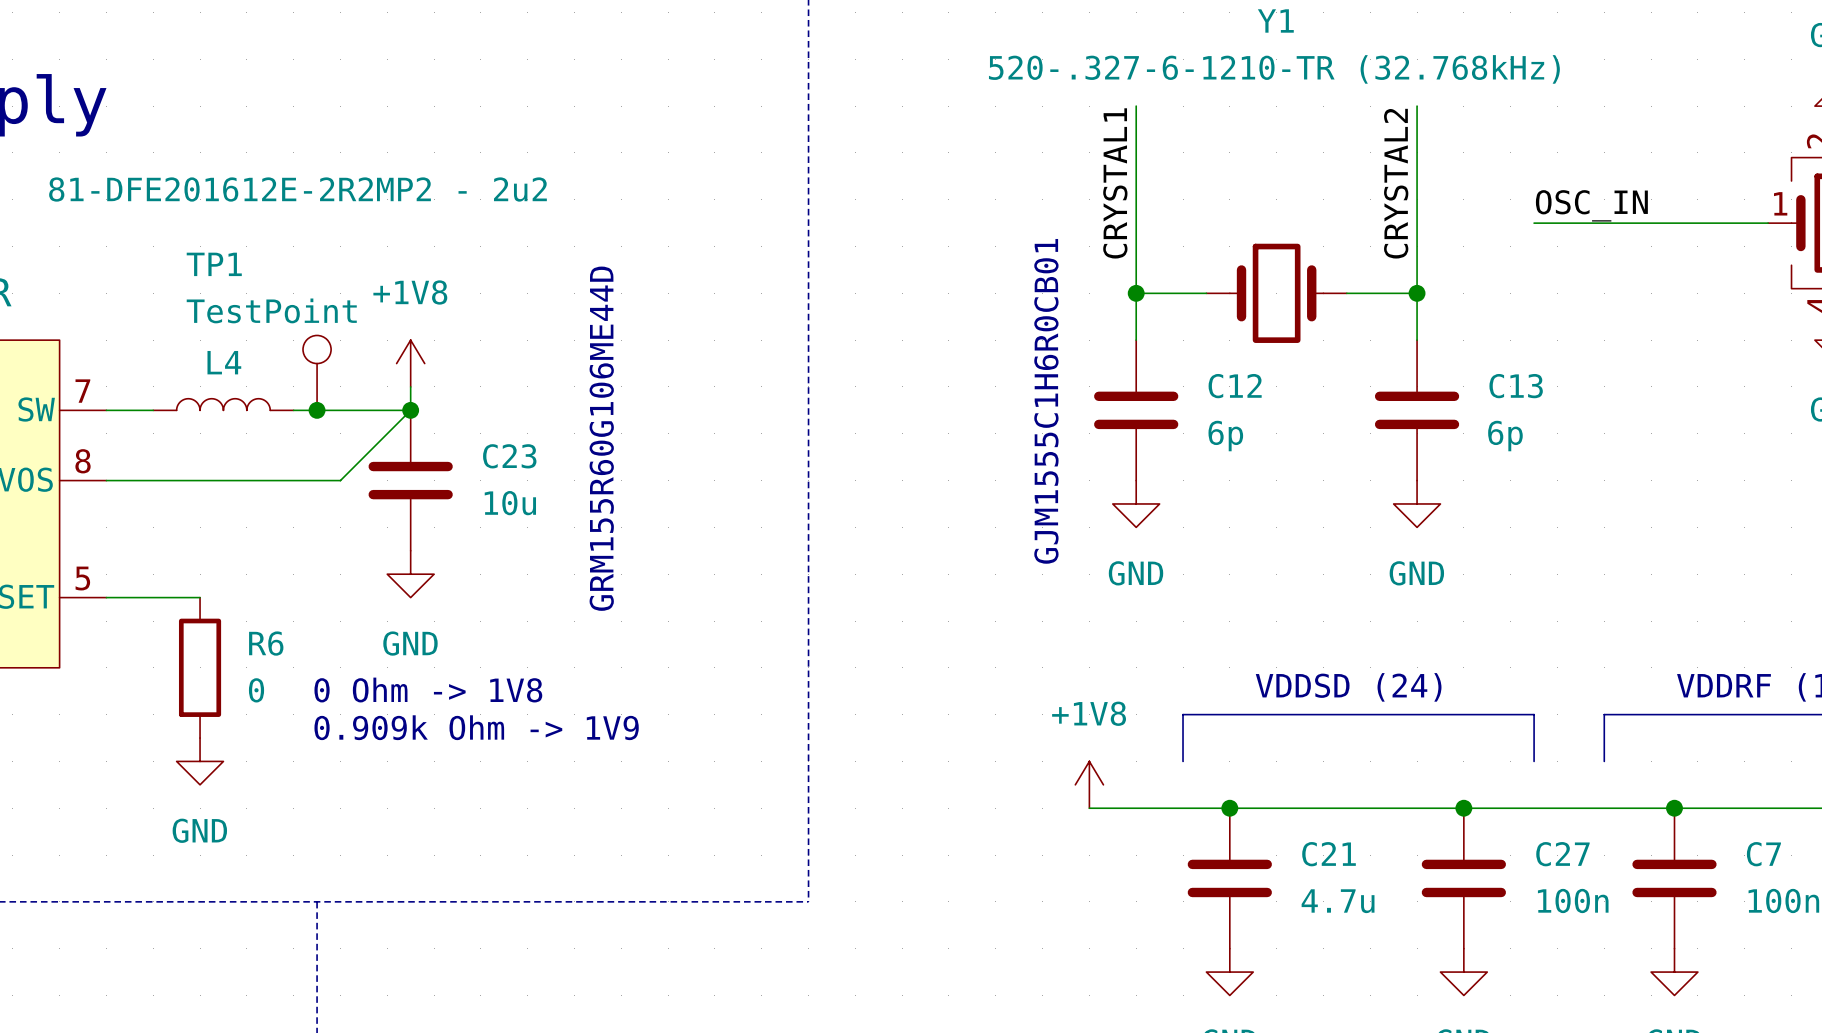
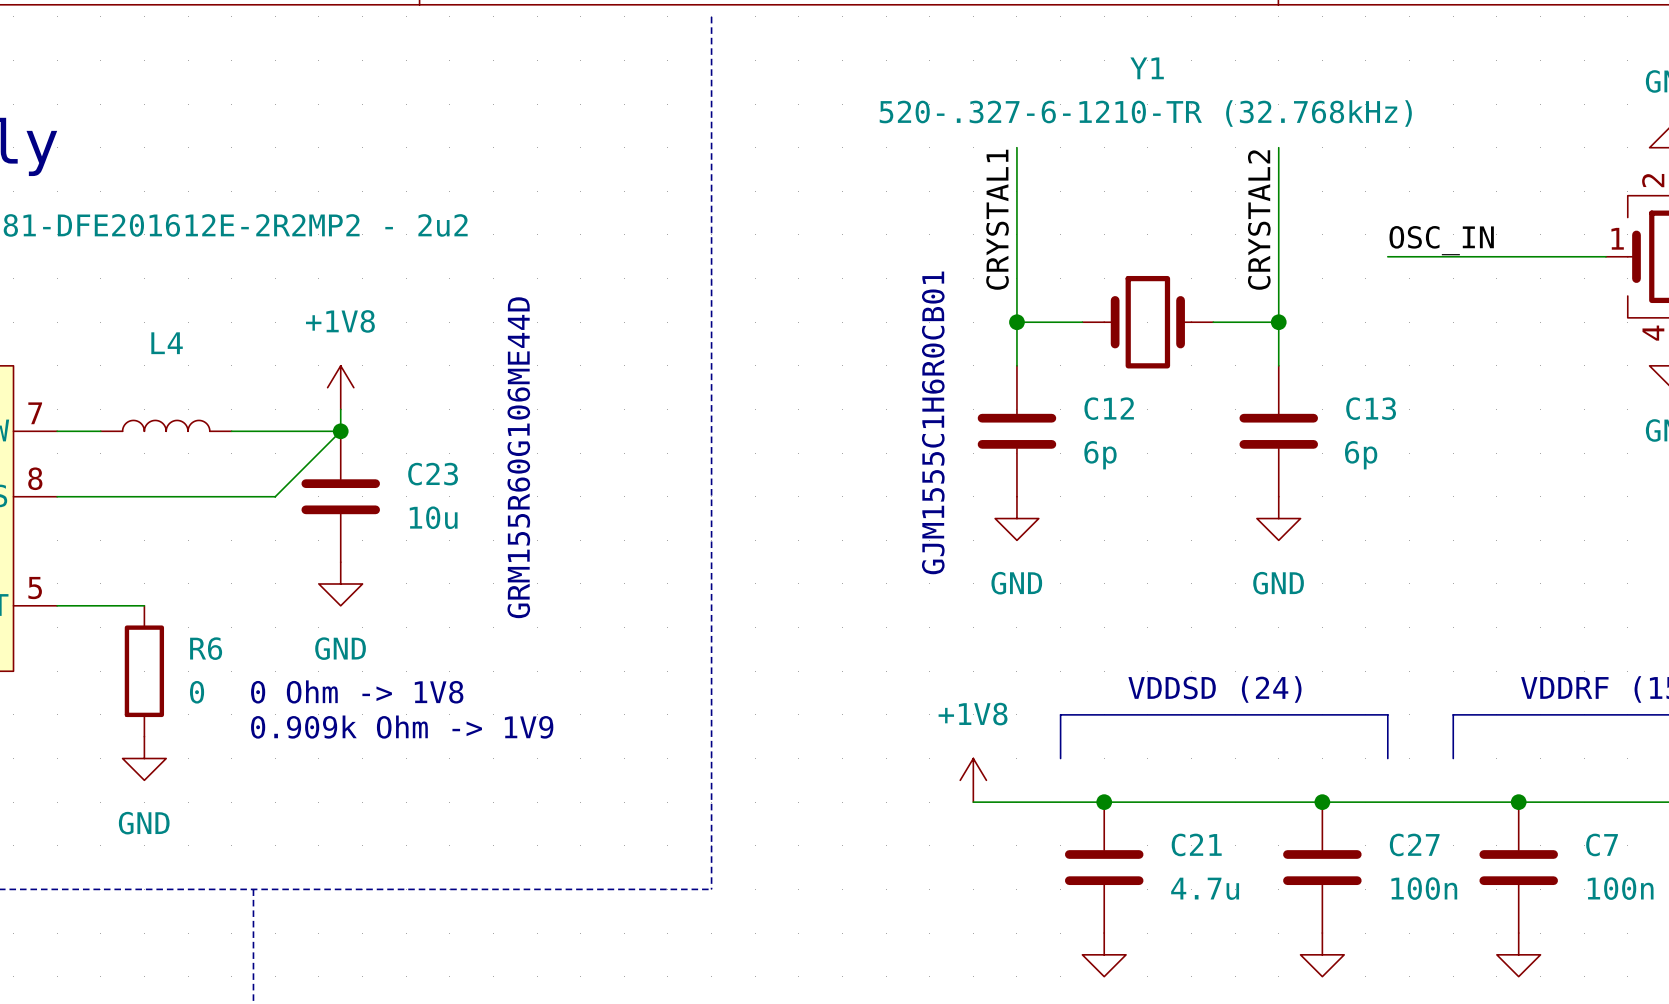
L4 name position: L4 (224, 362) -> L4 (167, 343)
TP1: TestPoint (317, 372) -> none
junction: (317, 410) -> none

